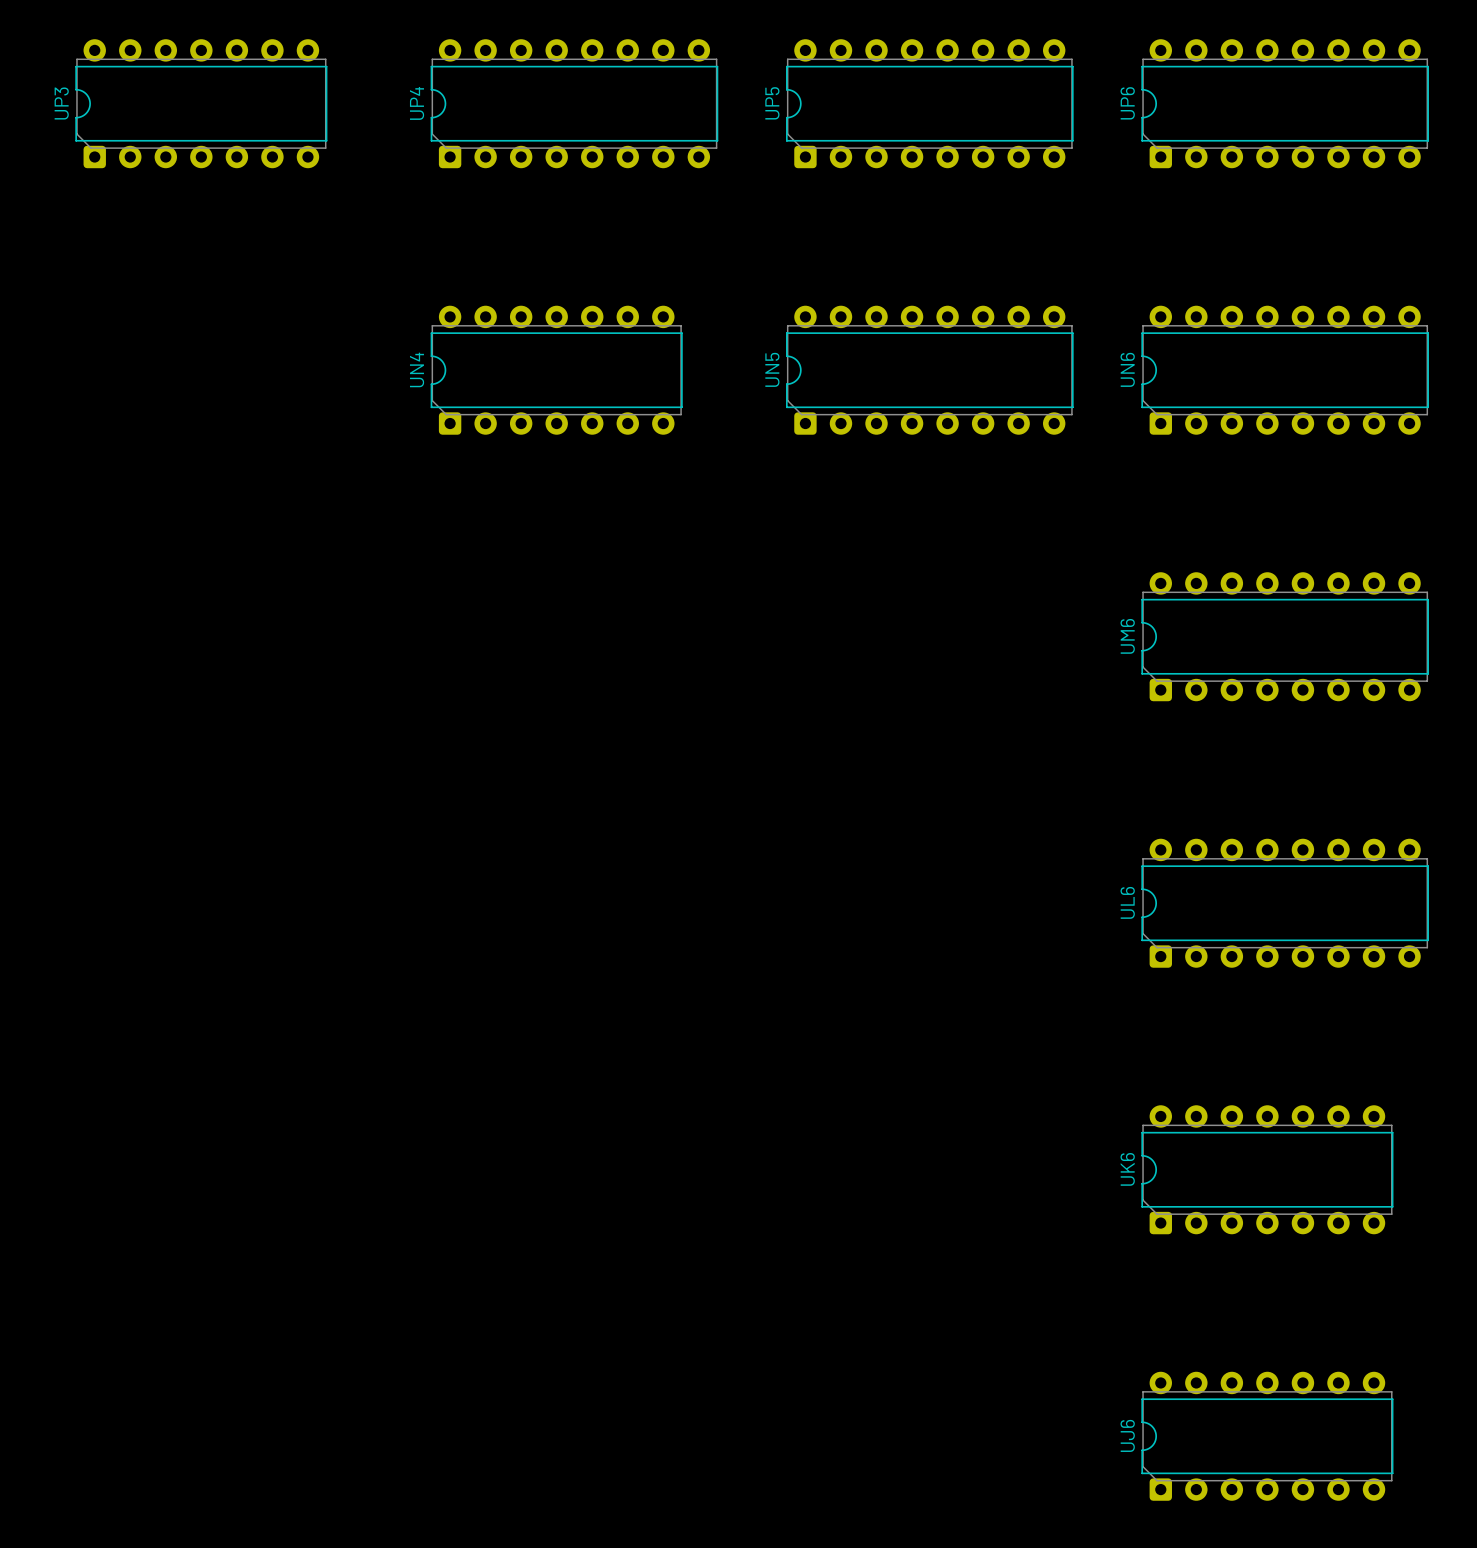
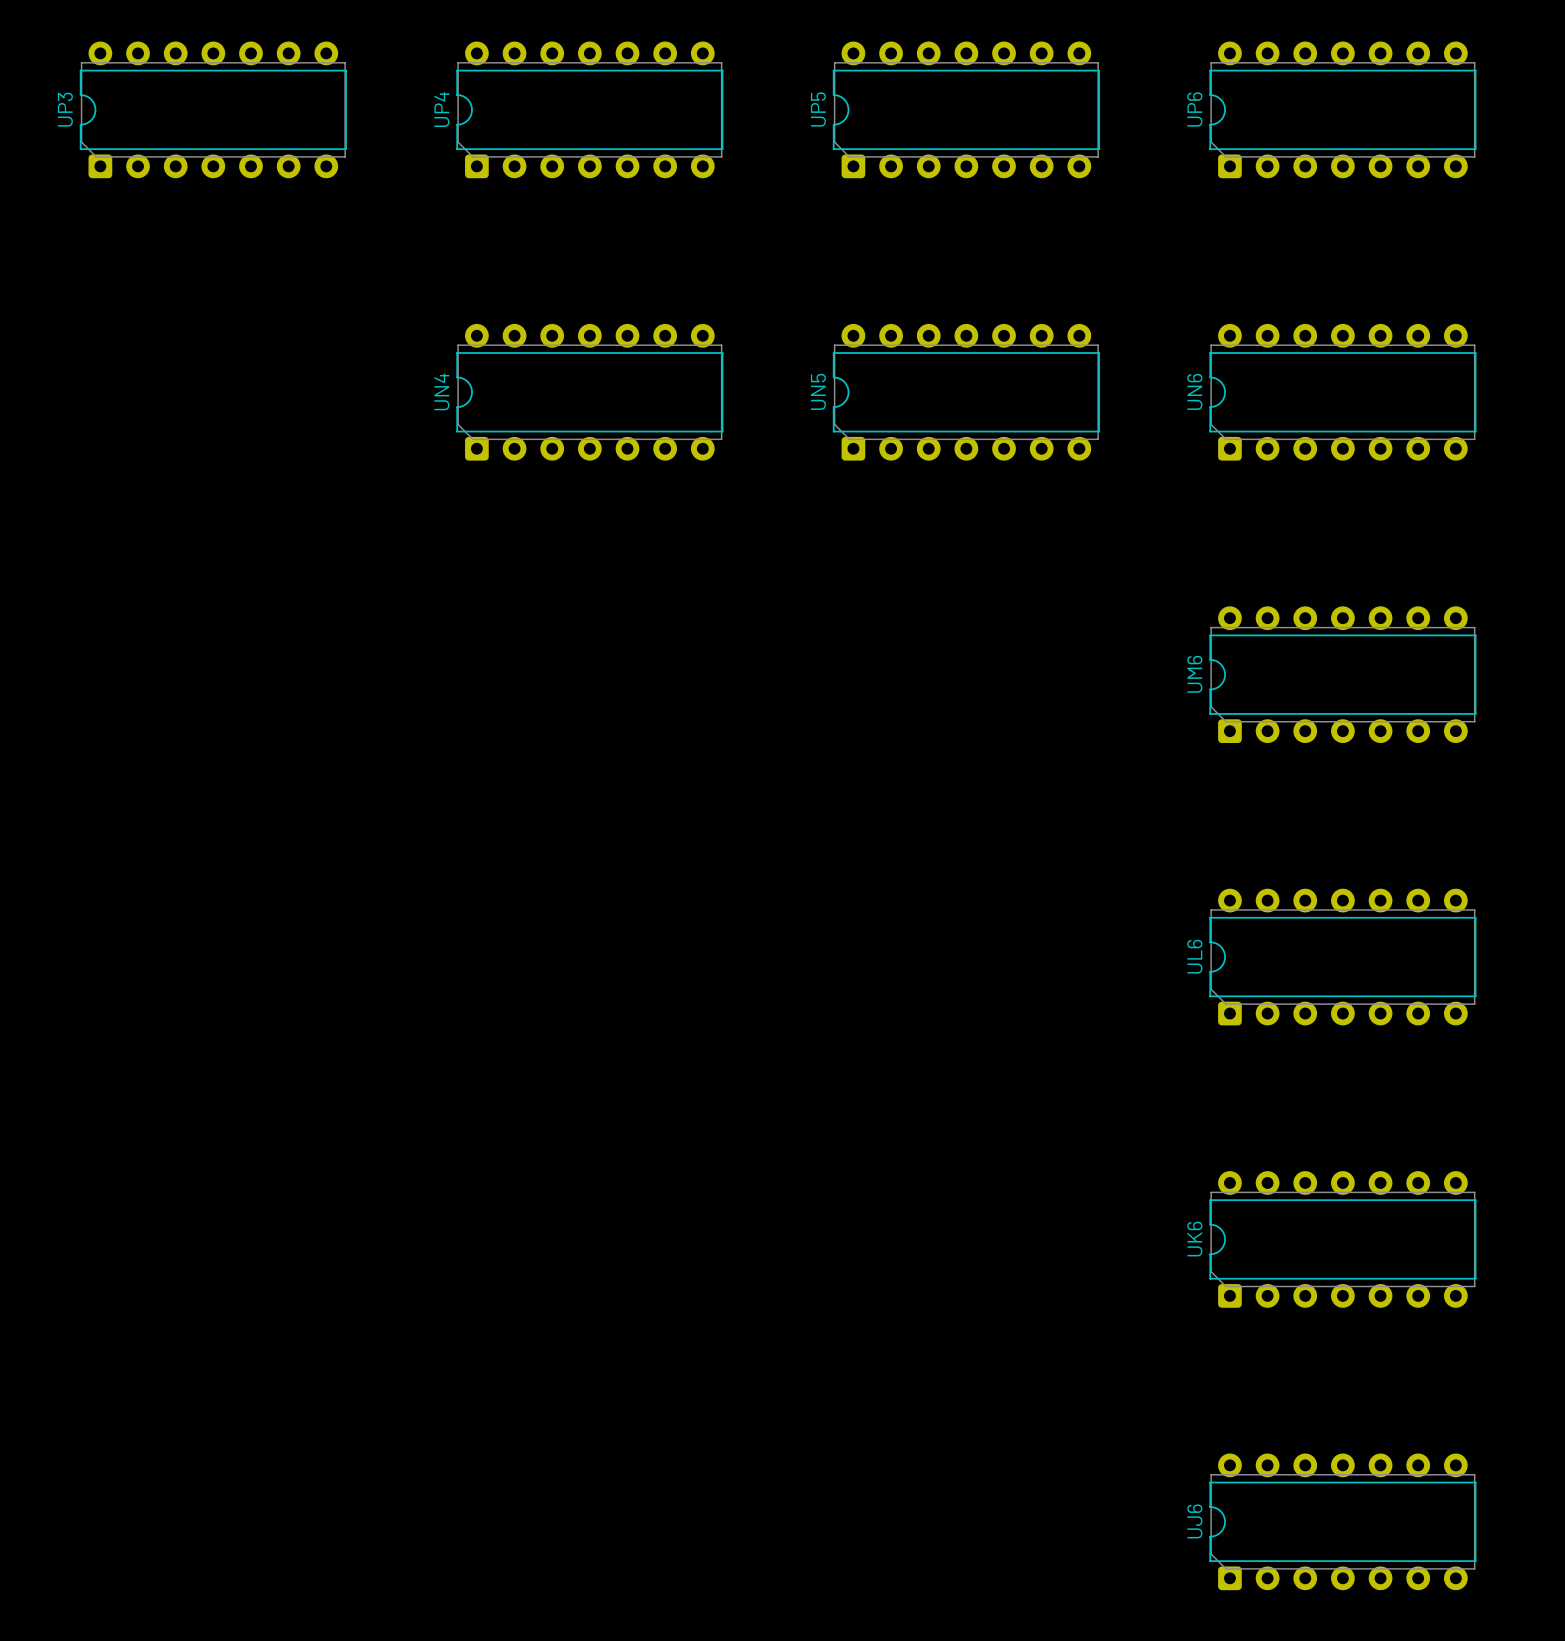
UP4 footprint: [430, 39, 719, 169] -> [456, 41, 724, 179]
UP5 footprint: [786, 39, 1074, 169] -> [832, 41, 1100, 179]
UP6 footprint: [1141, 39, 1429, 169] -> [1209, 41, 1477, 179]
UN5 footprint: [786, 305, 1074, 435] -> [832, 323, 1100, 461]
UN6 footprint: [1141, 305, 1429, 435] -> [1209, 323, 1477, 461]
UM6 footprint: [1141, 572, 1429, 702] -> [1209, 606, 1477, 744]
UL6 footprint: [1141, 838, 1429, 968] -> [1209, 888, 1477, 1026]

